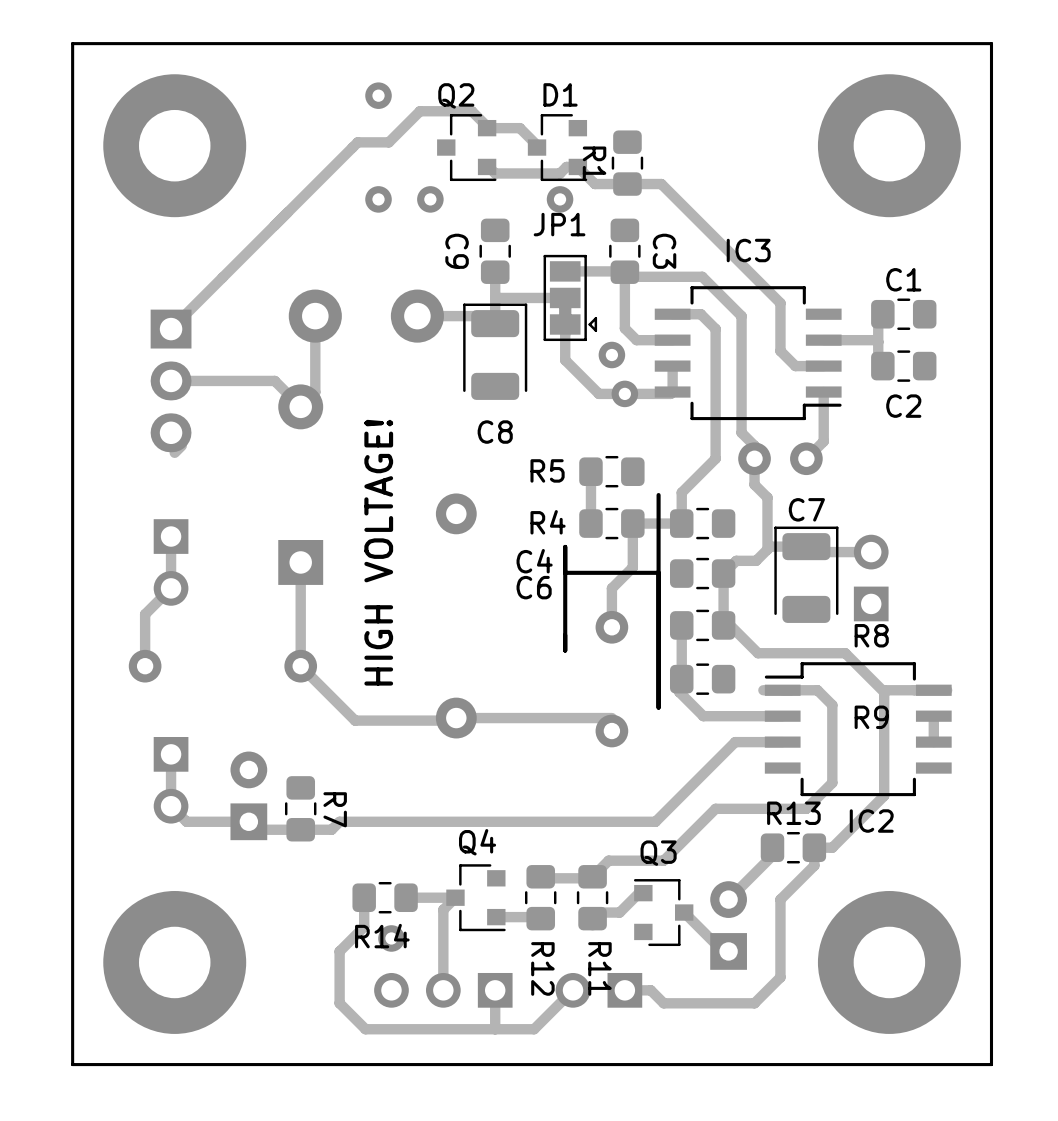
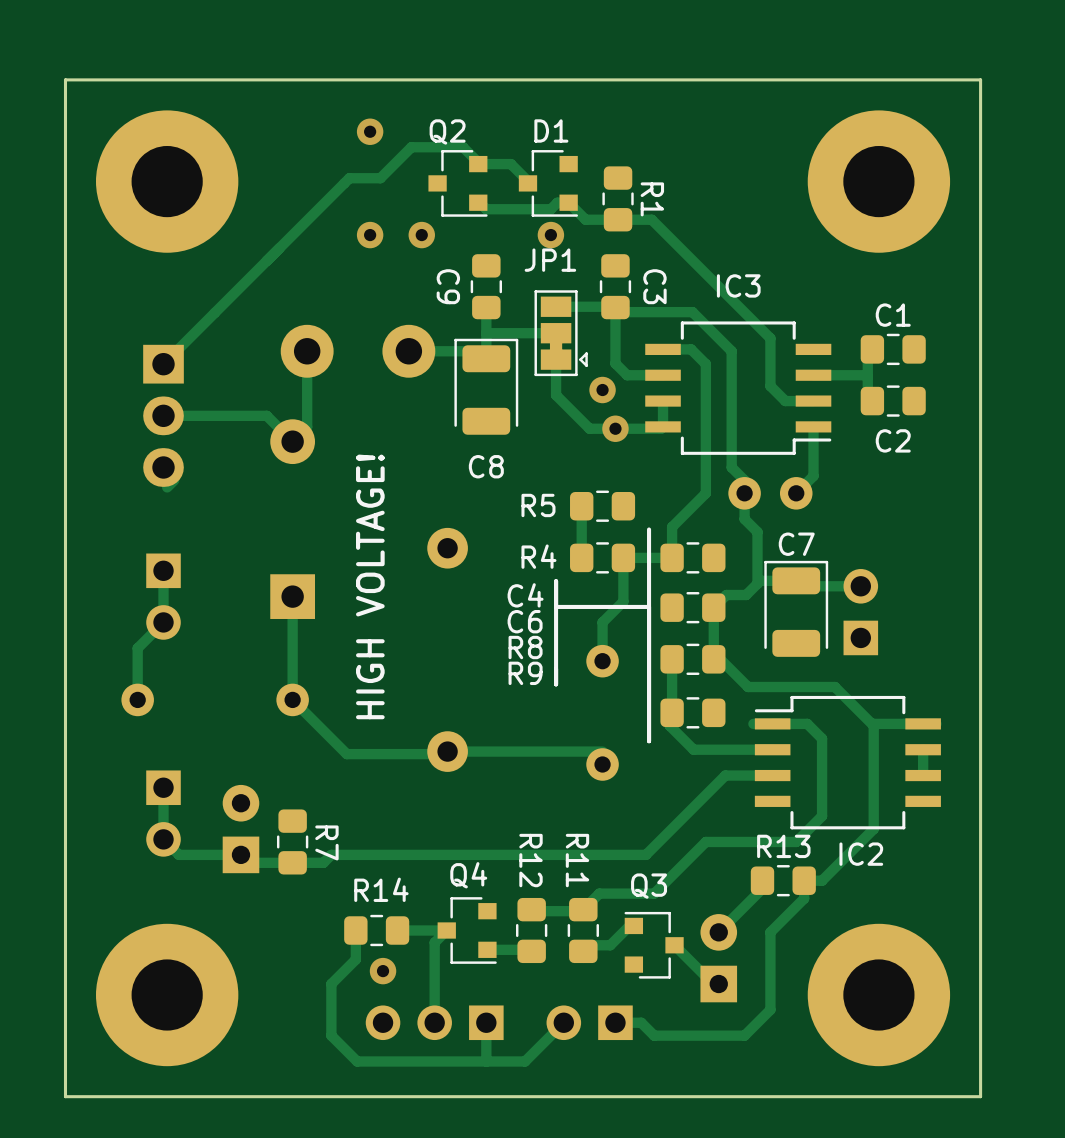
R1 name position: R1 (594, 163) -> R1 (652, 199)
R8 name position: R8 (871, 635) -> R8 (525, 647)
R9 name position: R9 (871, 717) -> R9 (525, 673)
R14 name position: R14 (382, 936) -> R14 (381, 889)
R12 name position: R12 (542, 968) -> R12 (531, 860)
R11 name position: R11 (599, 968) -> R11 (577, 860)

